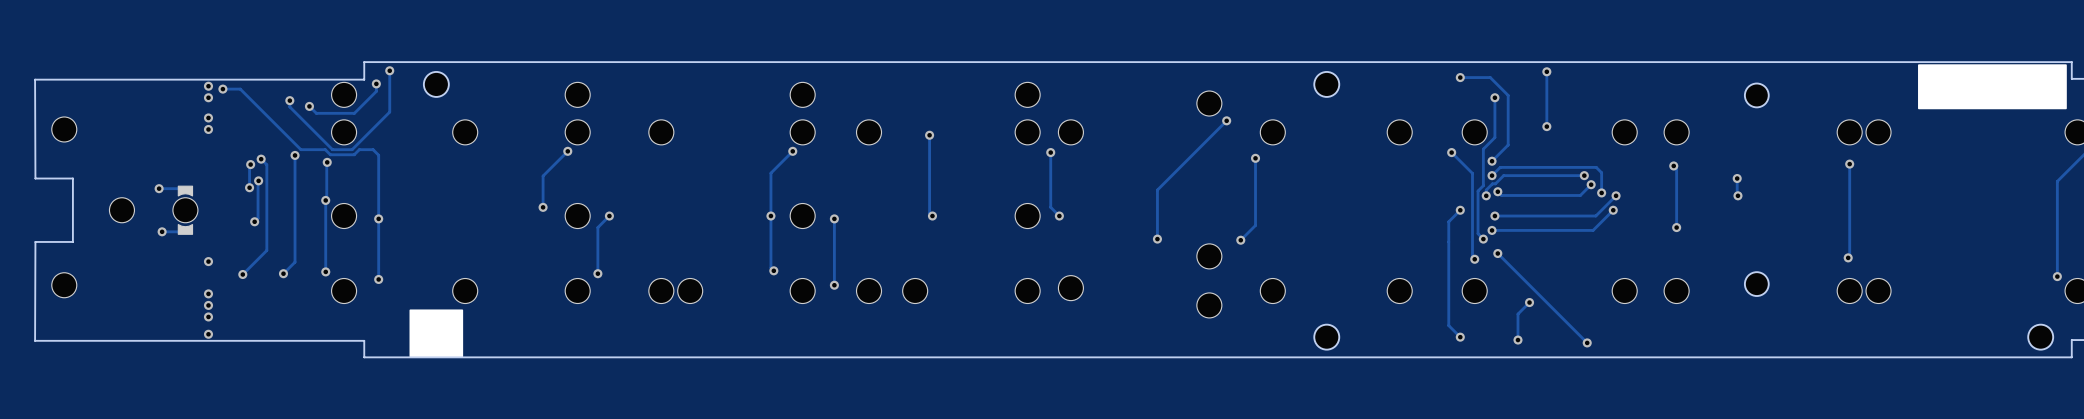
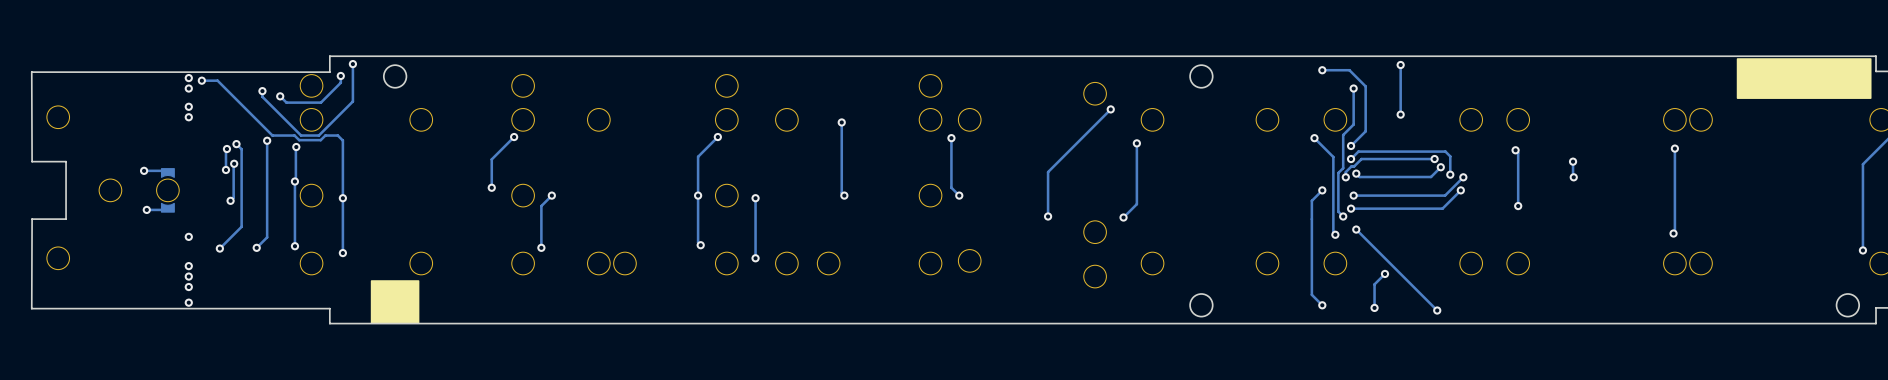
part: (1756, 95) -> none
part: (1756, 284) -> none

